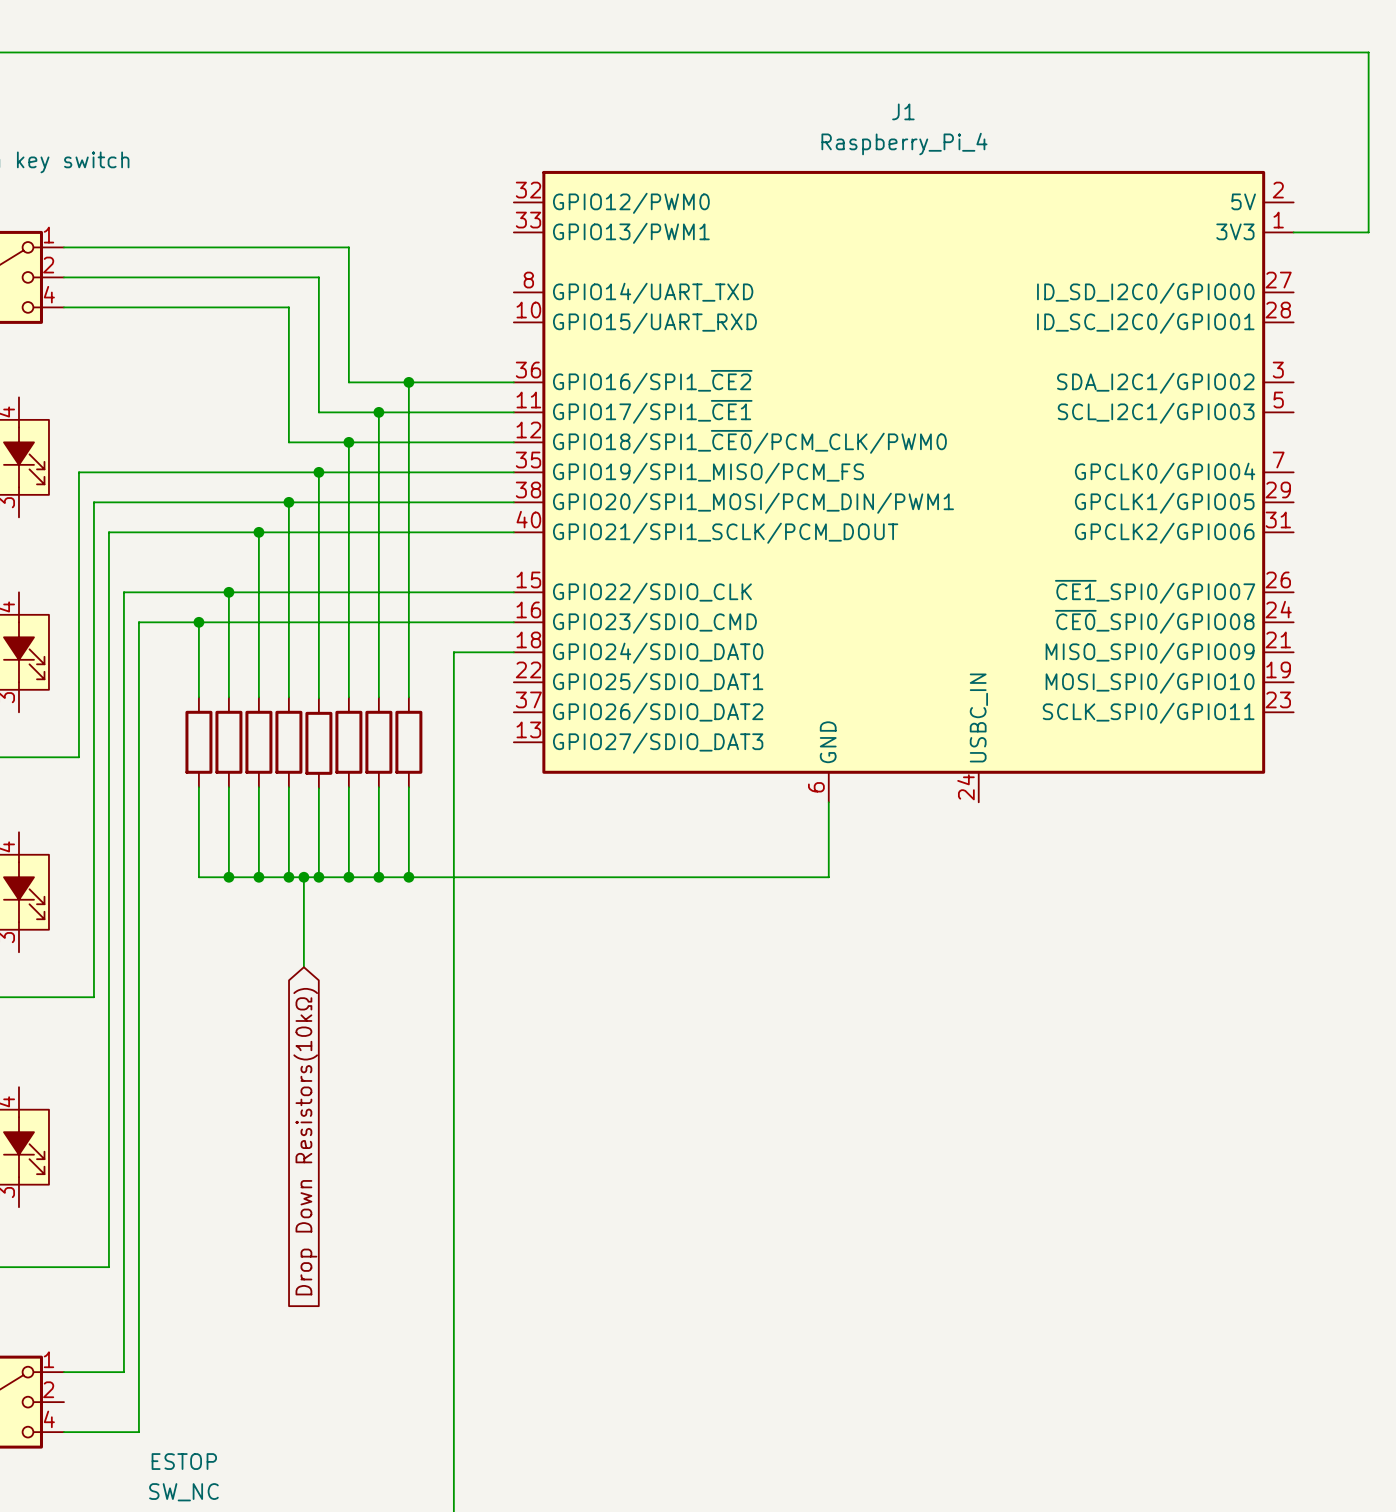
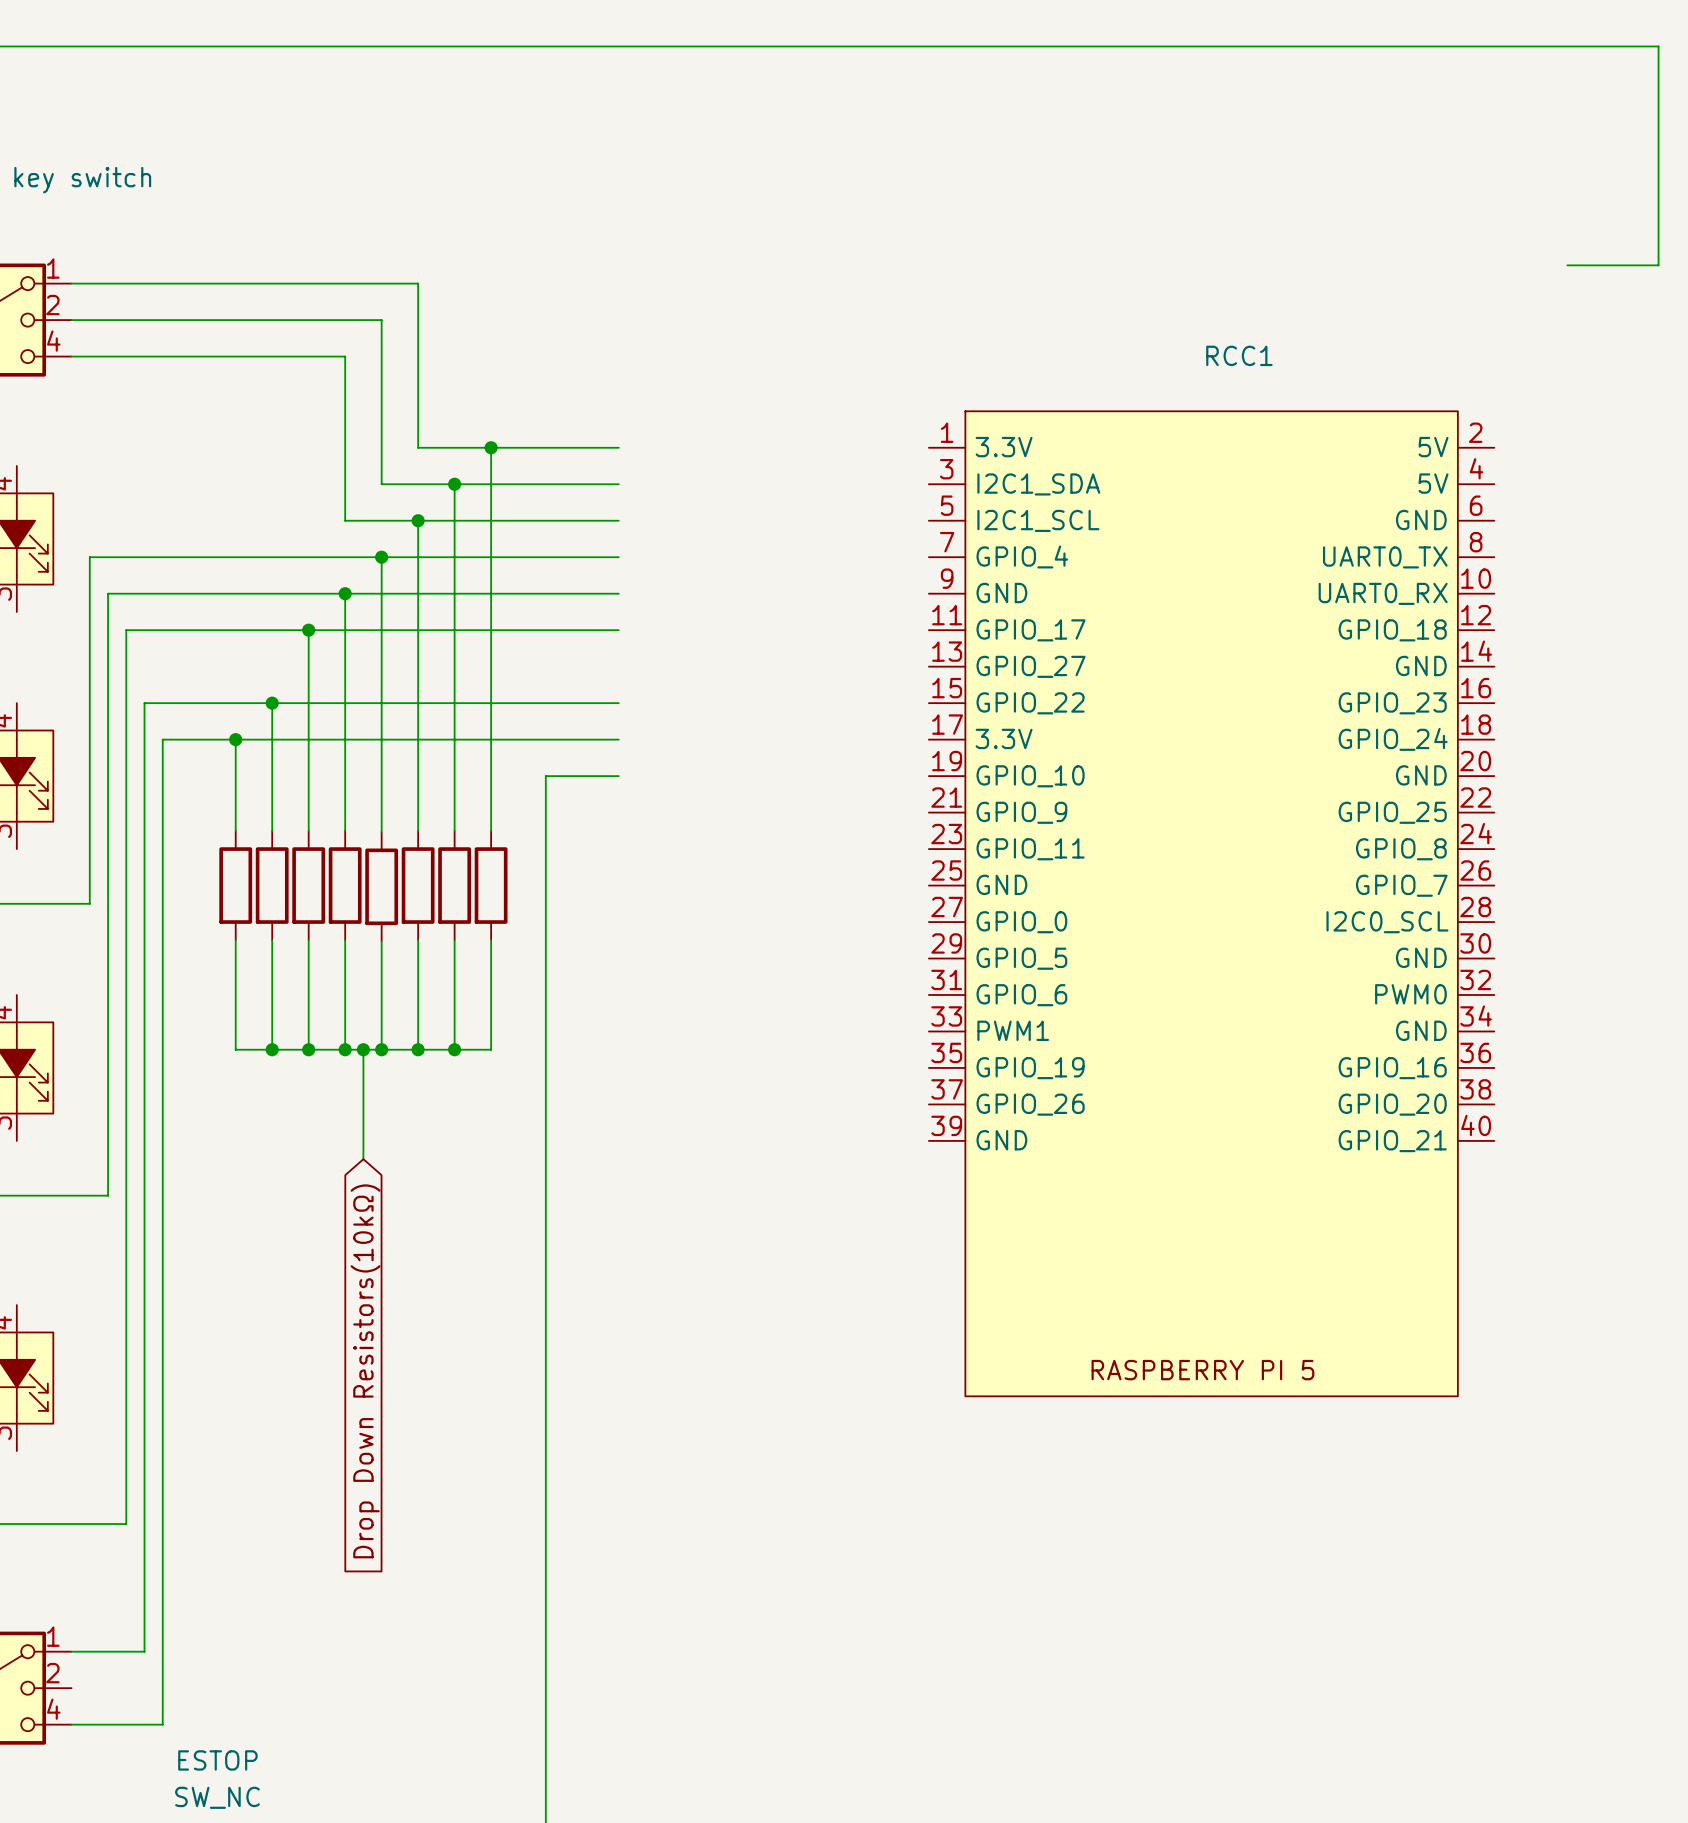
J1: Raspberry_Pi_4 (903, 486) -> none
RCC1: none -> (1220, 903)
wire: (828, 802) (828, 877) (408, 877) -> none
junction: (408, 877) -> none

